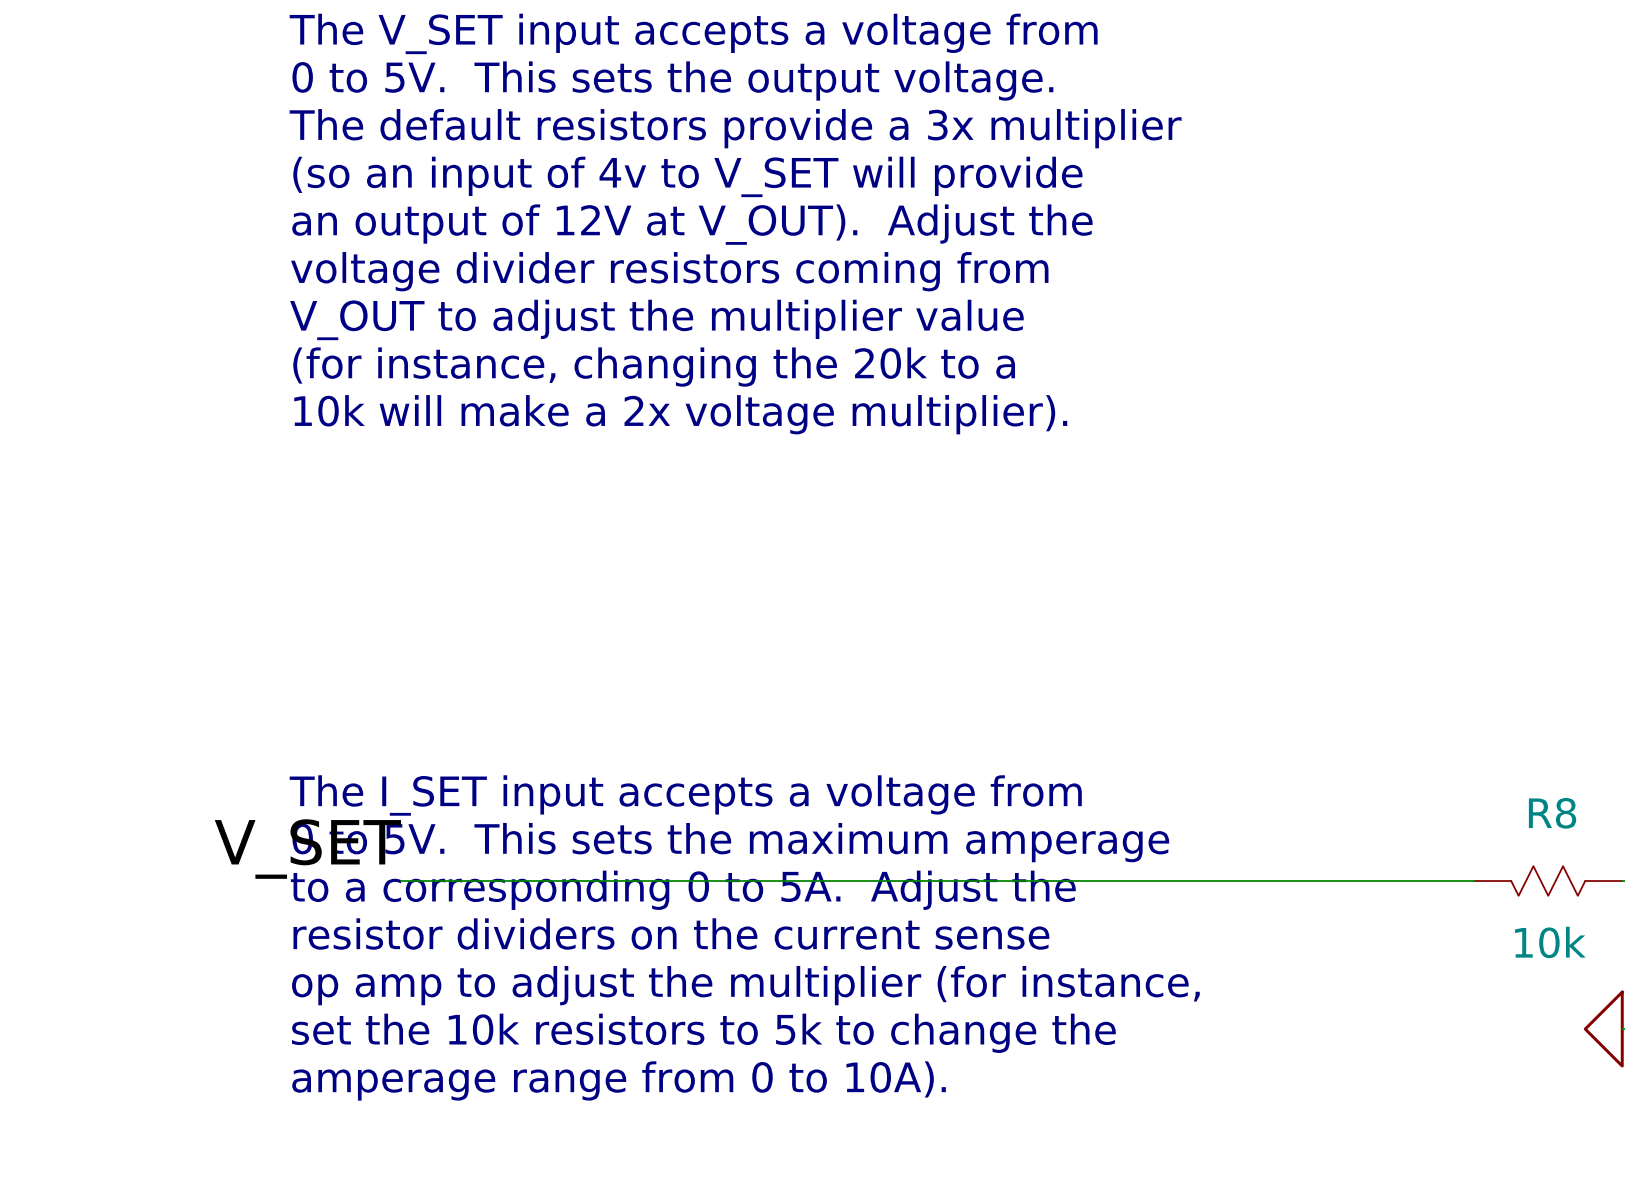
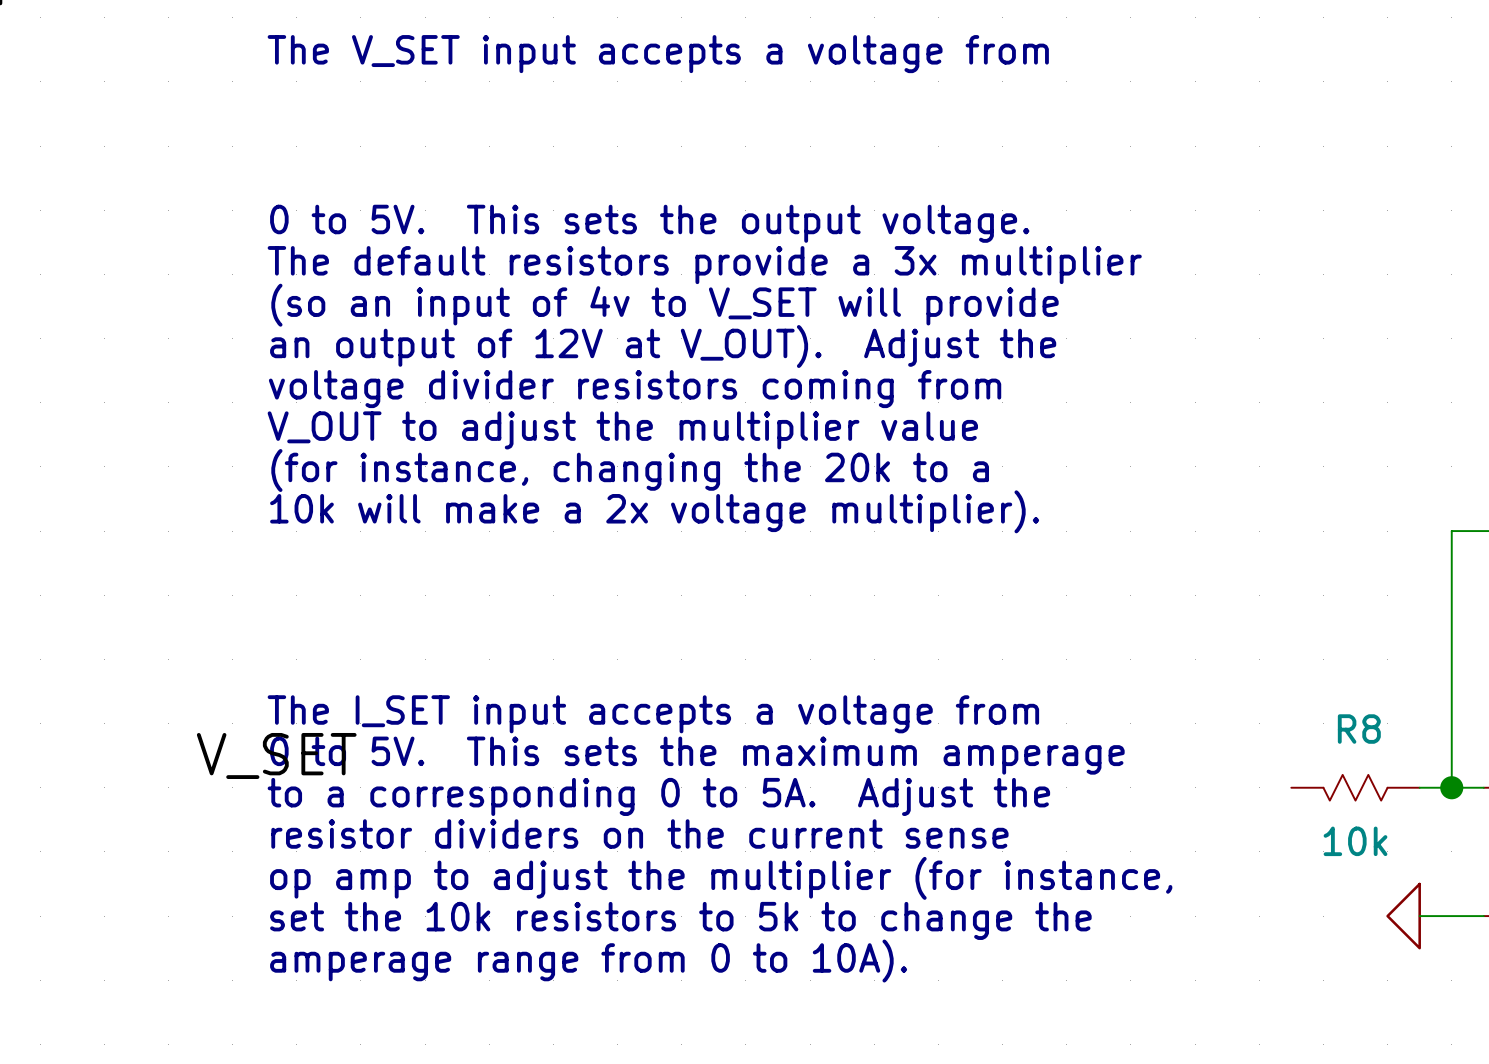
text position: 0 to 5V. This sets the output voltage. (672, 81) -> 0 to 5V. This sets the output voltage. (649, 223)
text position: The default resistors provide a 3x multiplier (735, 128) -> The default resistors provide a 3x multiplier (704, 265)
text position: (so an input of 4v to V_SET will provide (687, 176) -> (so an input of 4v to V_SET will provide (664, 305)
text position: an output of 12V at V_OUT). Adjust the (692, 224) -> an output of 12V at V_OUT). Adjust the (663, 346)
text position: voltage divider resistors coming from (669, 271) -> voltage divider resistors coming from (635, 389)
text position: V_OUT to adjust the multiplier value (656, 319) -> V_OUT to adjust the multiplier value (622, 430)
text position: (for instance, changing the 20k to a (654, 367) -> (for instance, changing the 20k to a (630, 470)
text position: 10k will make a 2x voltage multiplier). (680, 414) -> 10k will make a 2x voltage multiplier). (654, 511)
wire: (400, 881) (1474, 881) -> none

